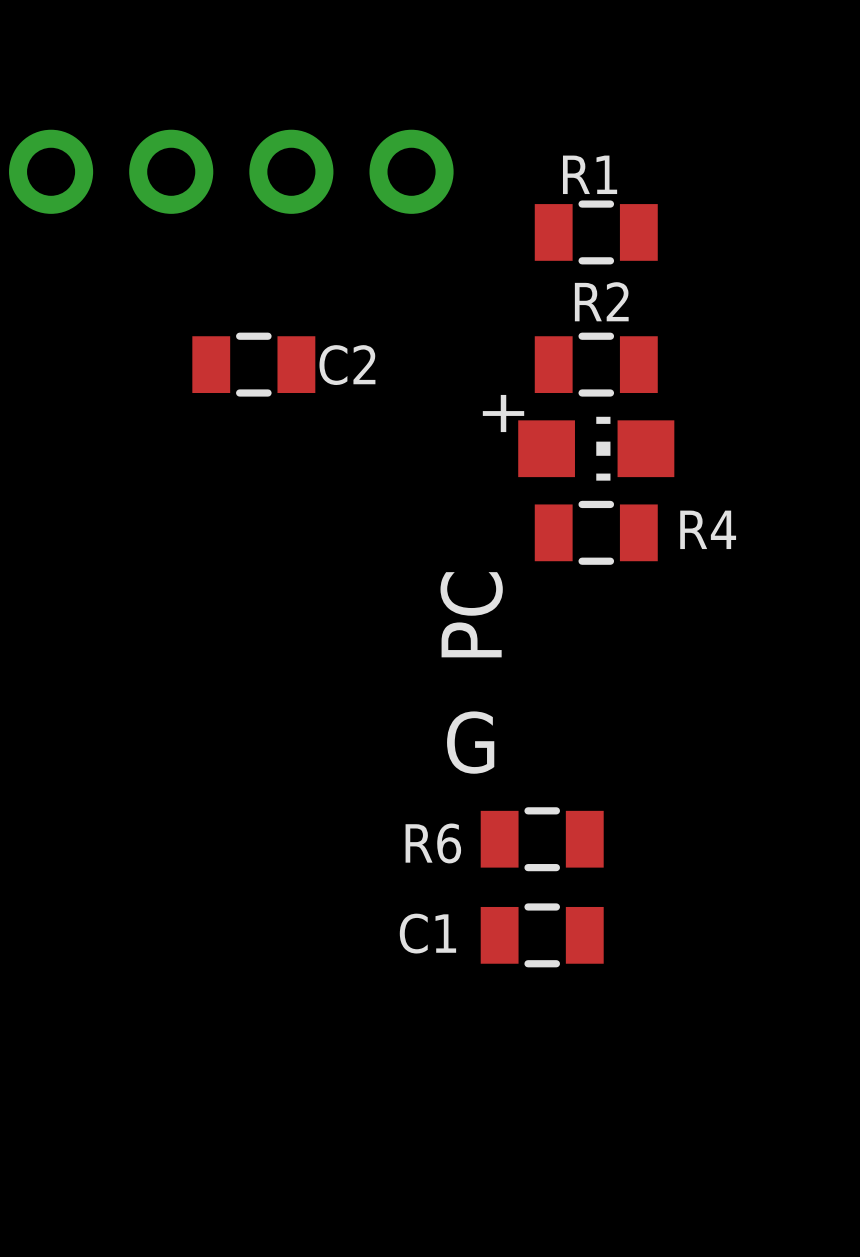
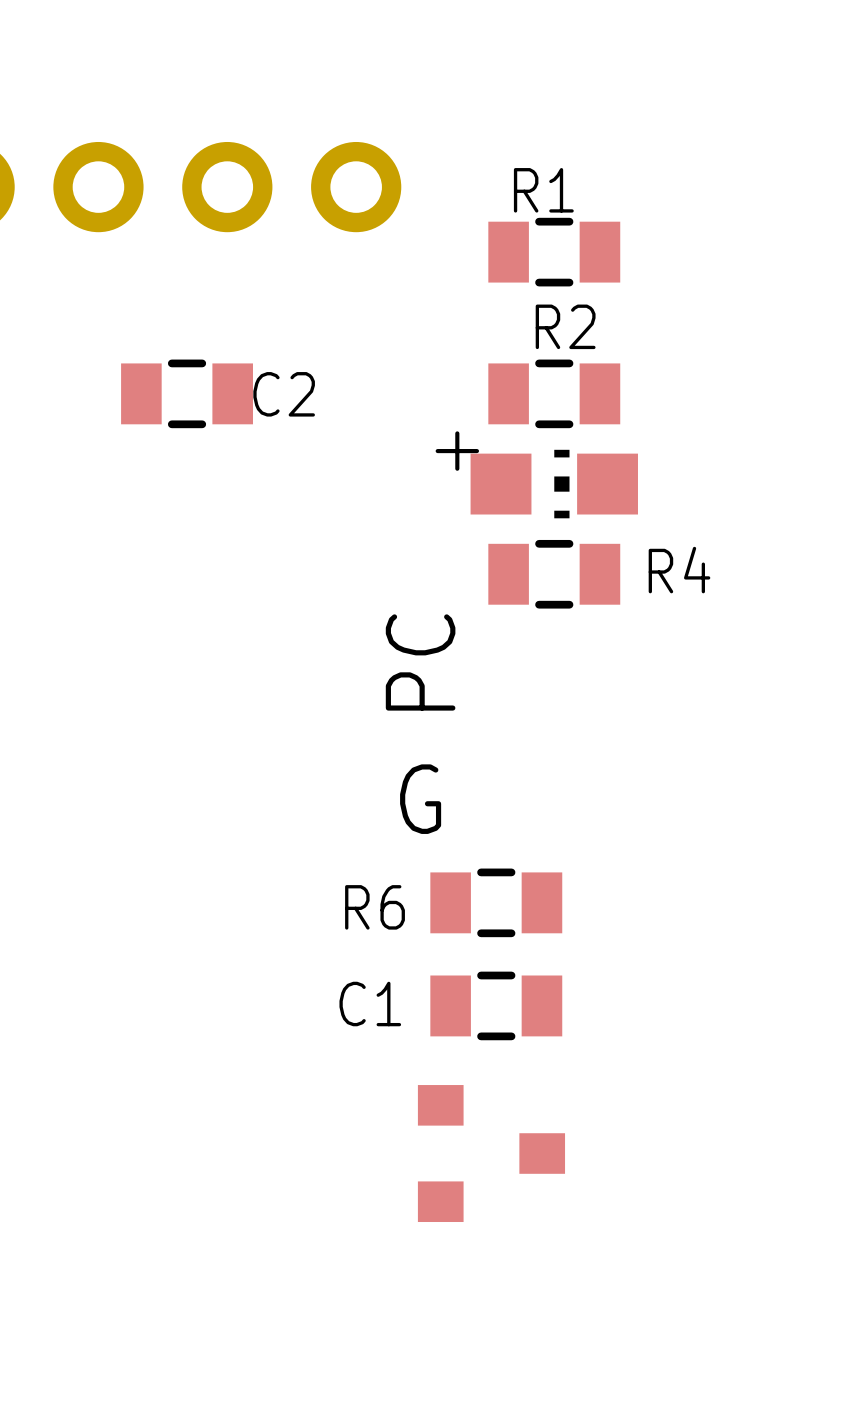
part: none -> (491, 1153)

